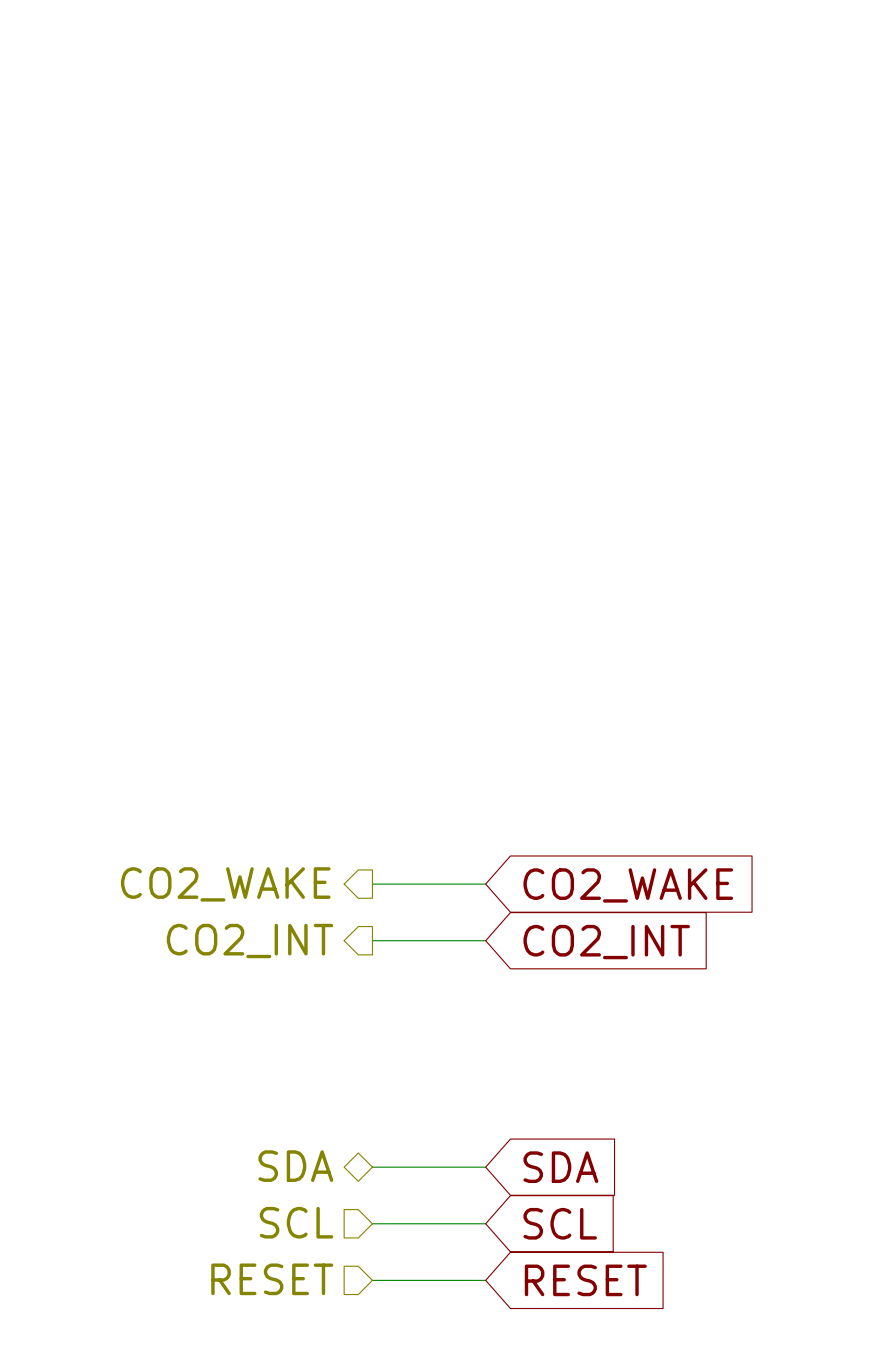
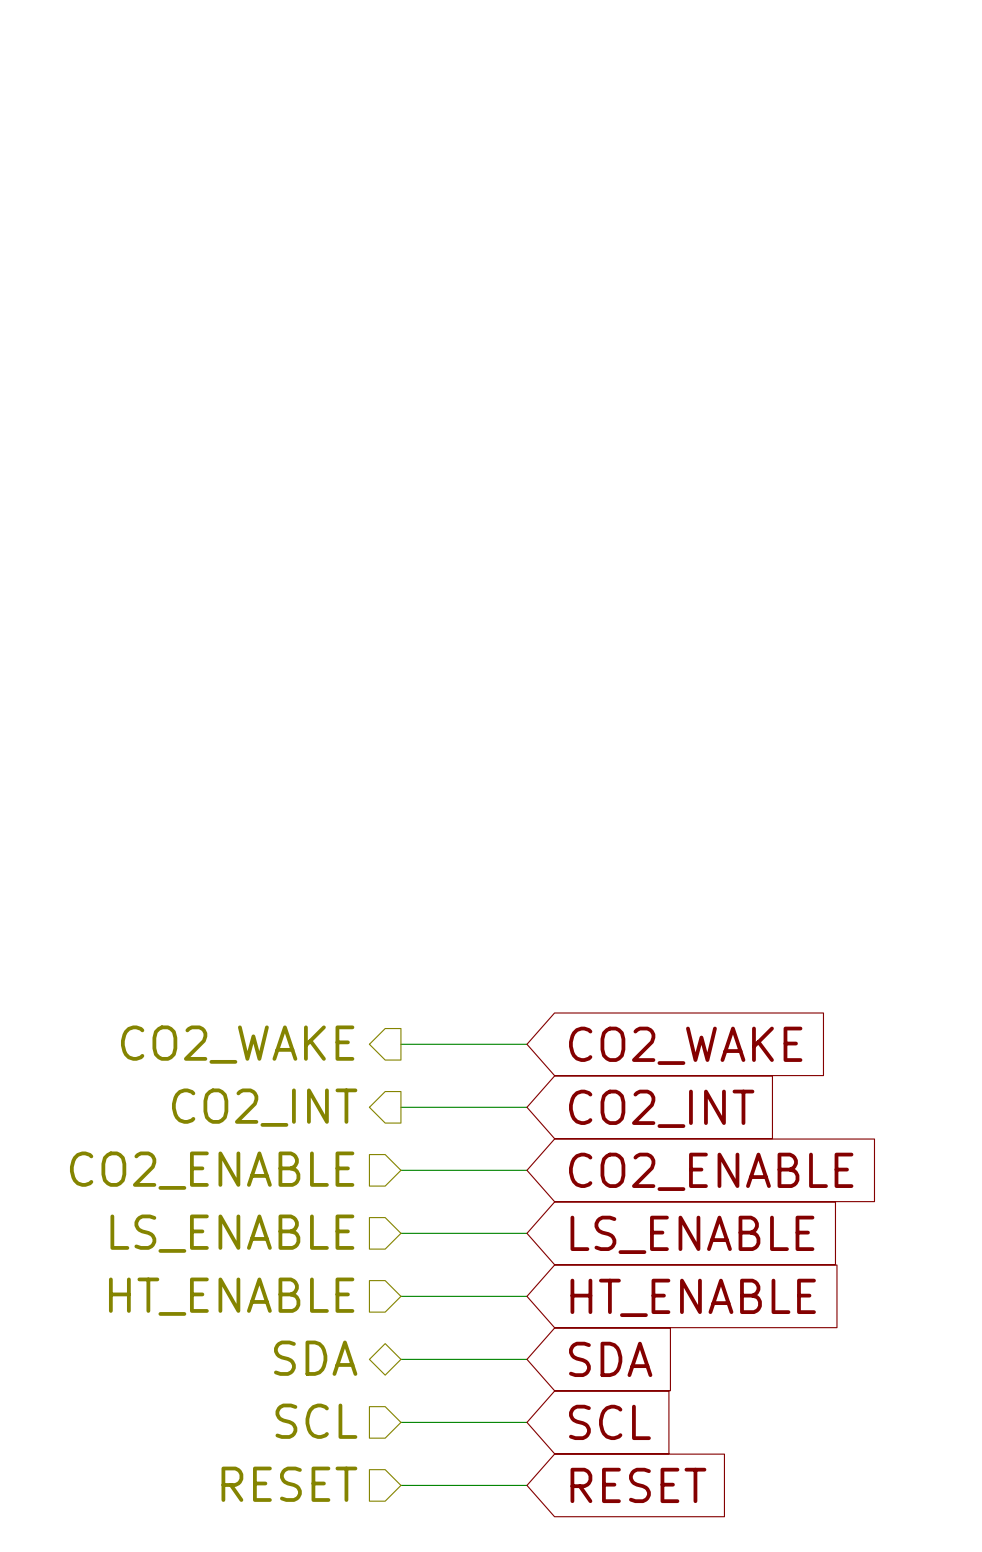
hierarchical label: none -> CO2_ENABLE (212, 1170)
wire: none -> (400, 1170) (526, 1170)
global label: none -> CO2_ENABLE (711, 1171)
wire: none -> (400, 1233) (526, 1233)
hierarchical label: none -> LS_ENABLE (232, 1233)
global label: none -> LS_ENABLE (692, 1234)
hierarchical label: none -> HT_ENABLE (231, 1296)
wire: none -> (400, 1296) (526, 1296)
global label: none -> HT_ENABLE (693, 1297)

